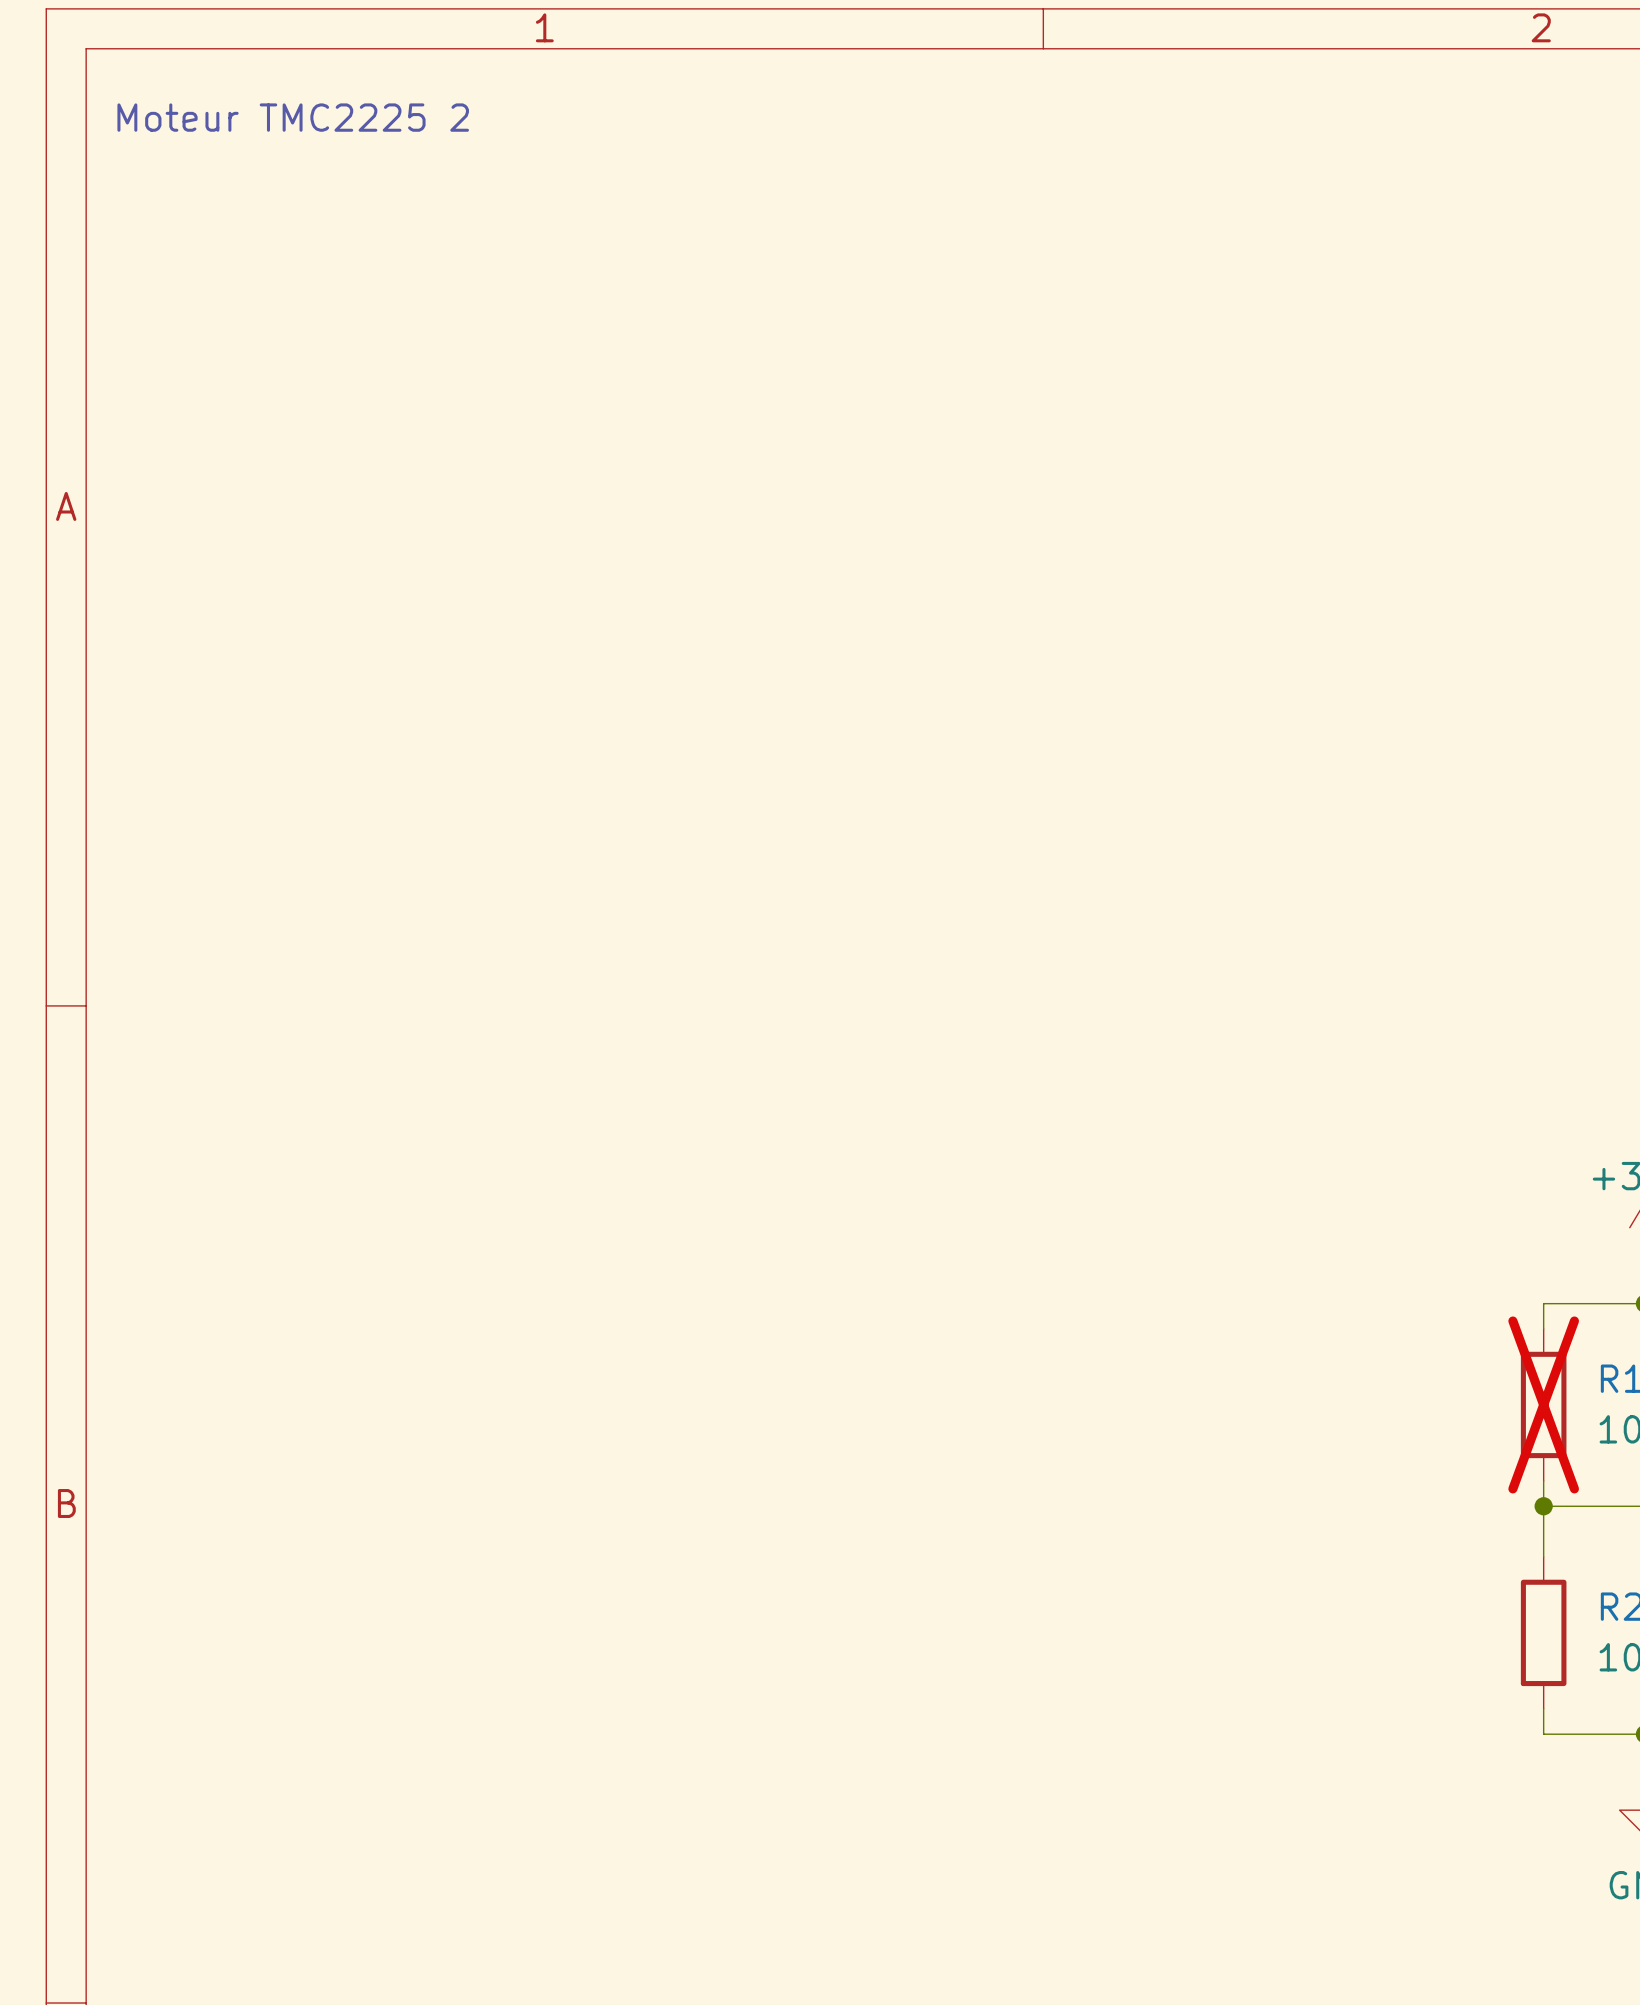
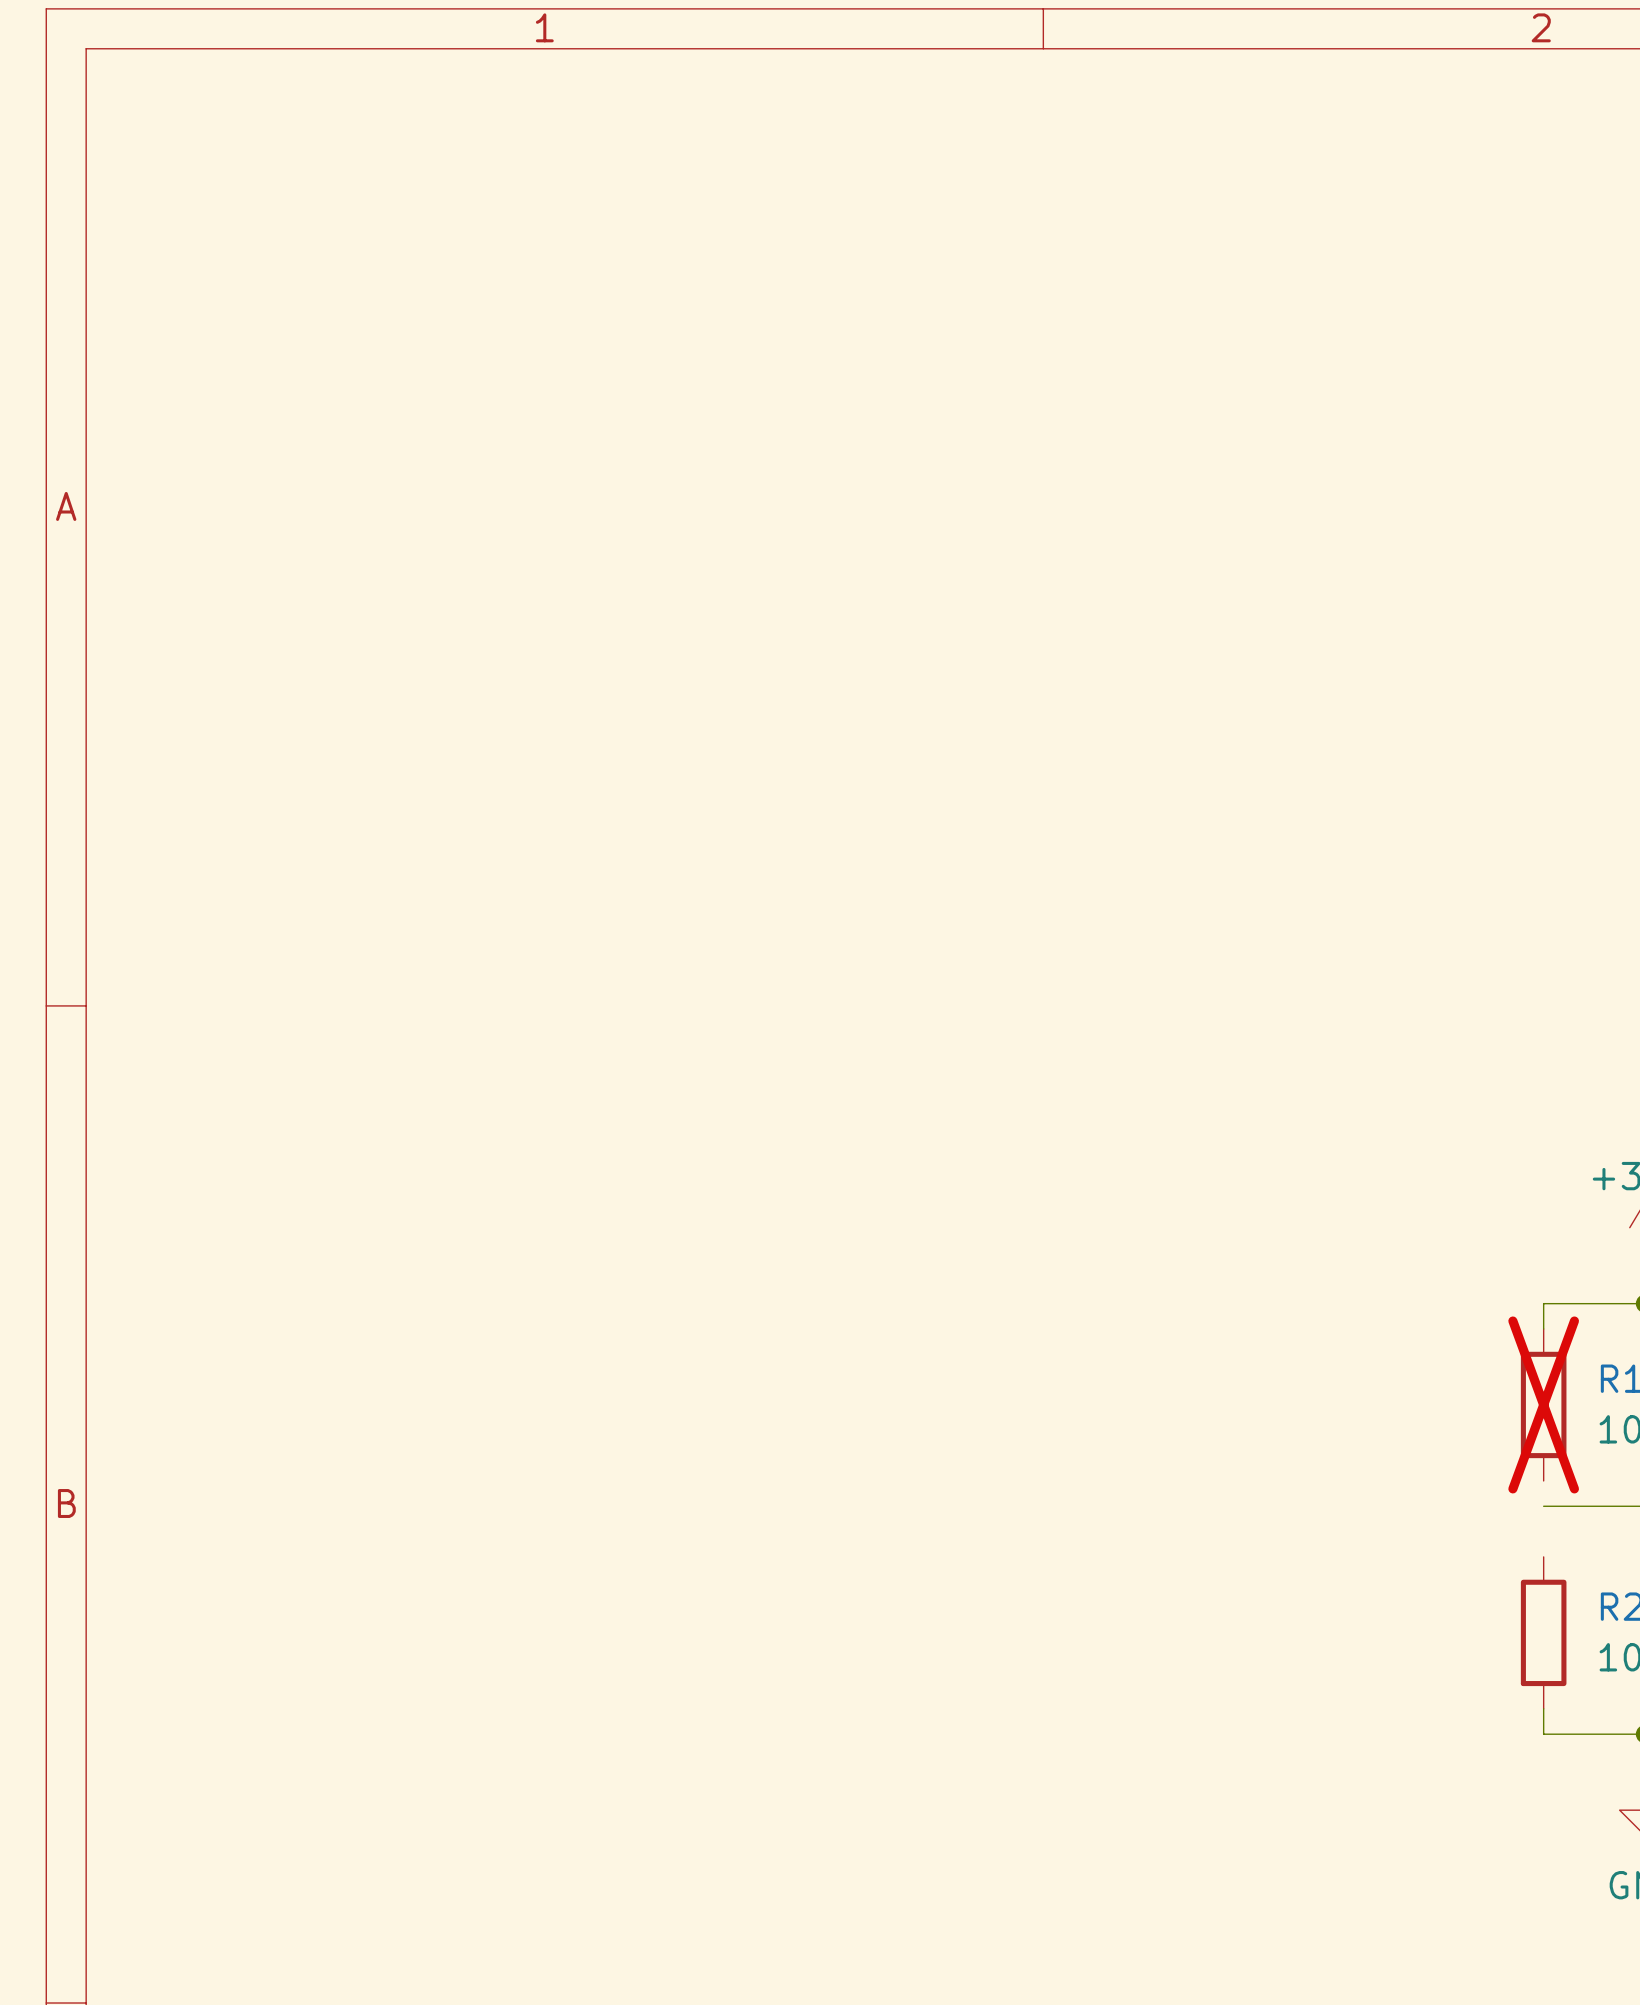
text: Moteur TMC2225 2 (293, 117) -> none
wire: (1543, 1480) (1543, 1556) -> none
junction: (1543, 1506) -> none

